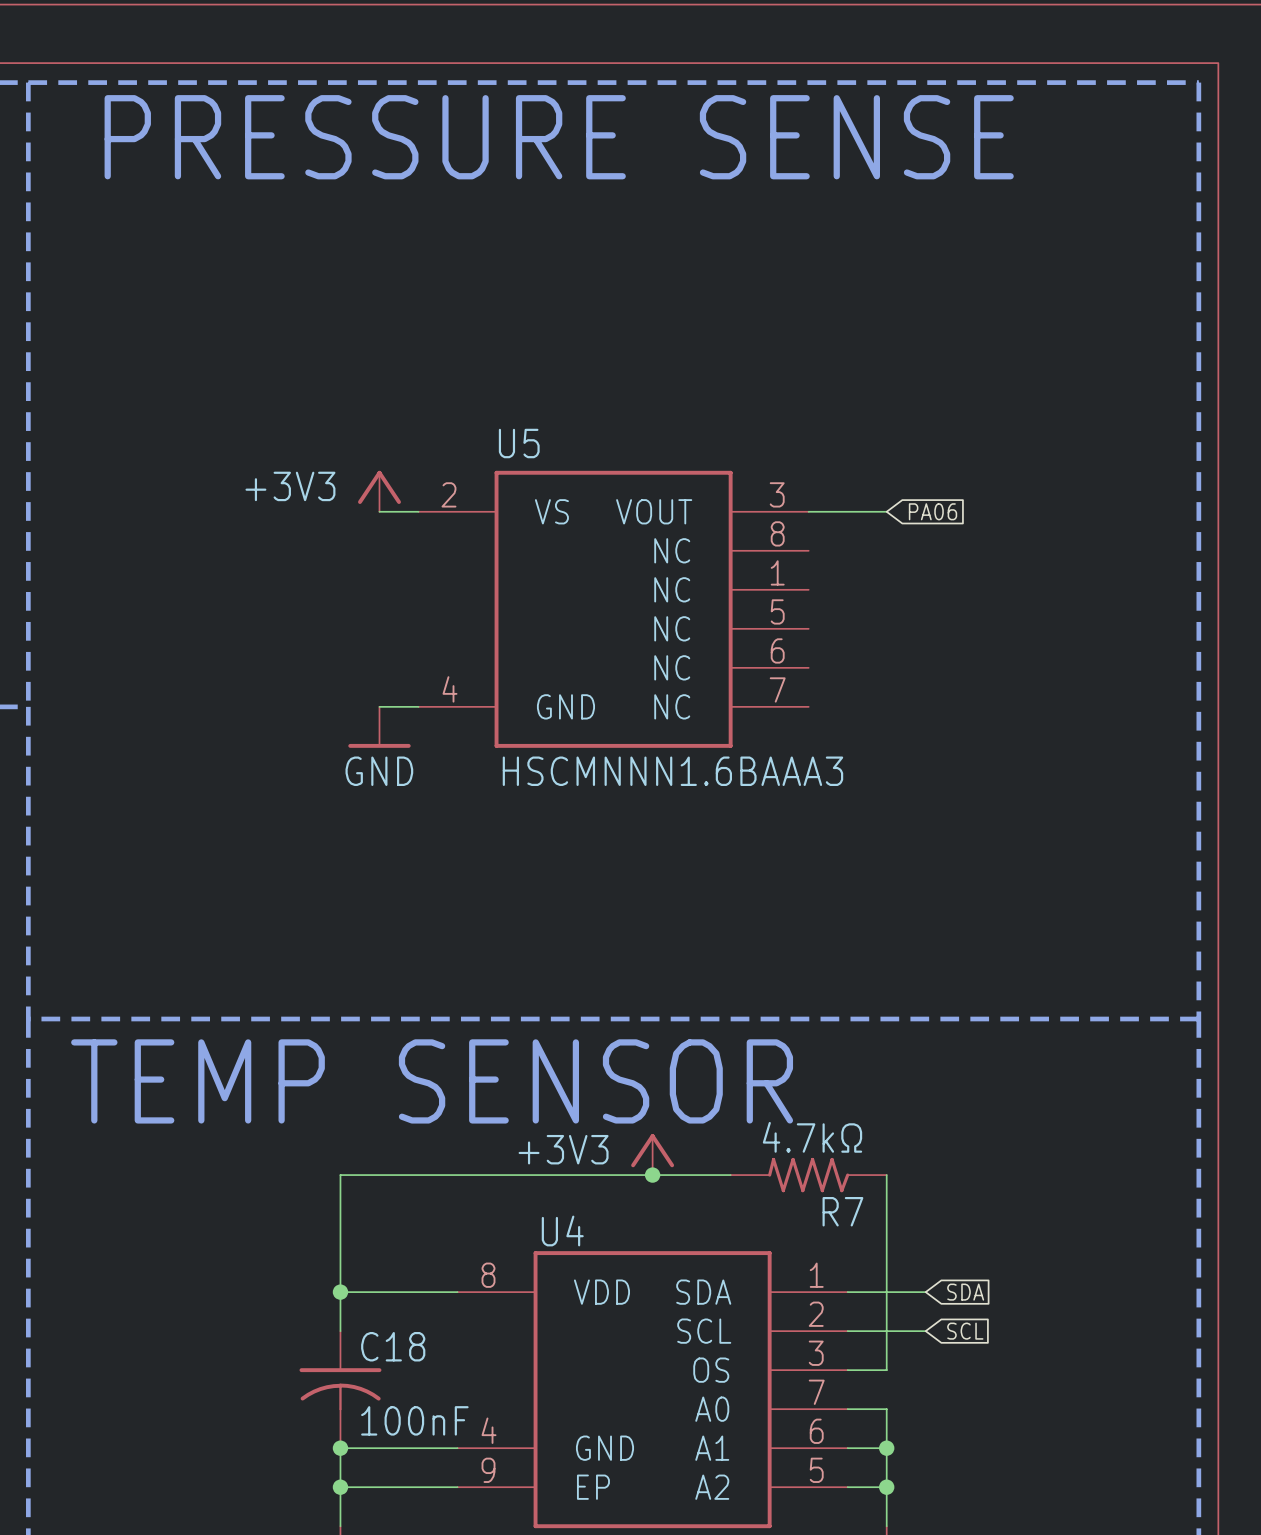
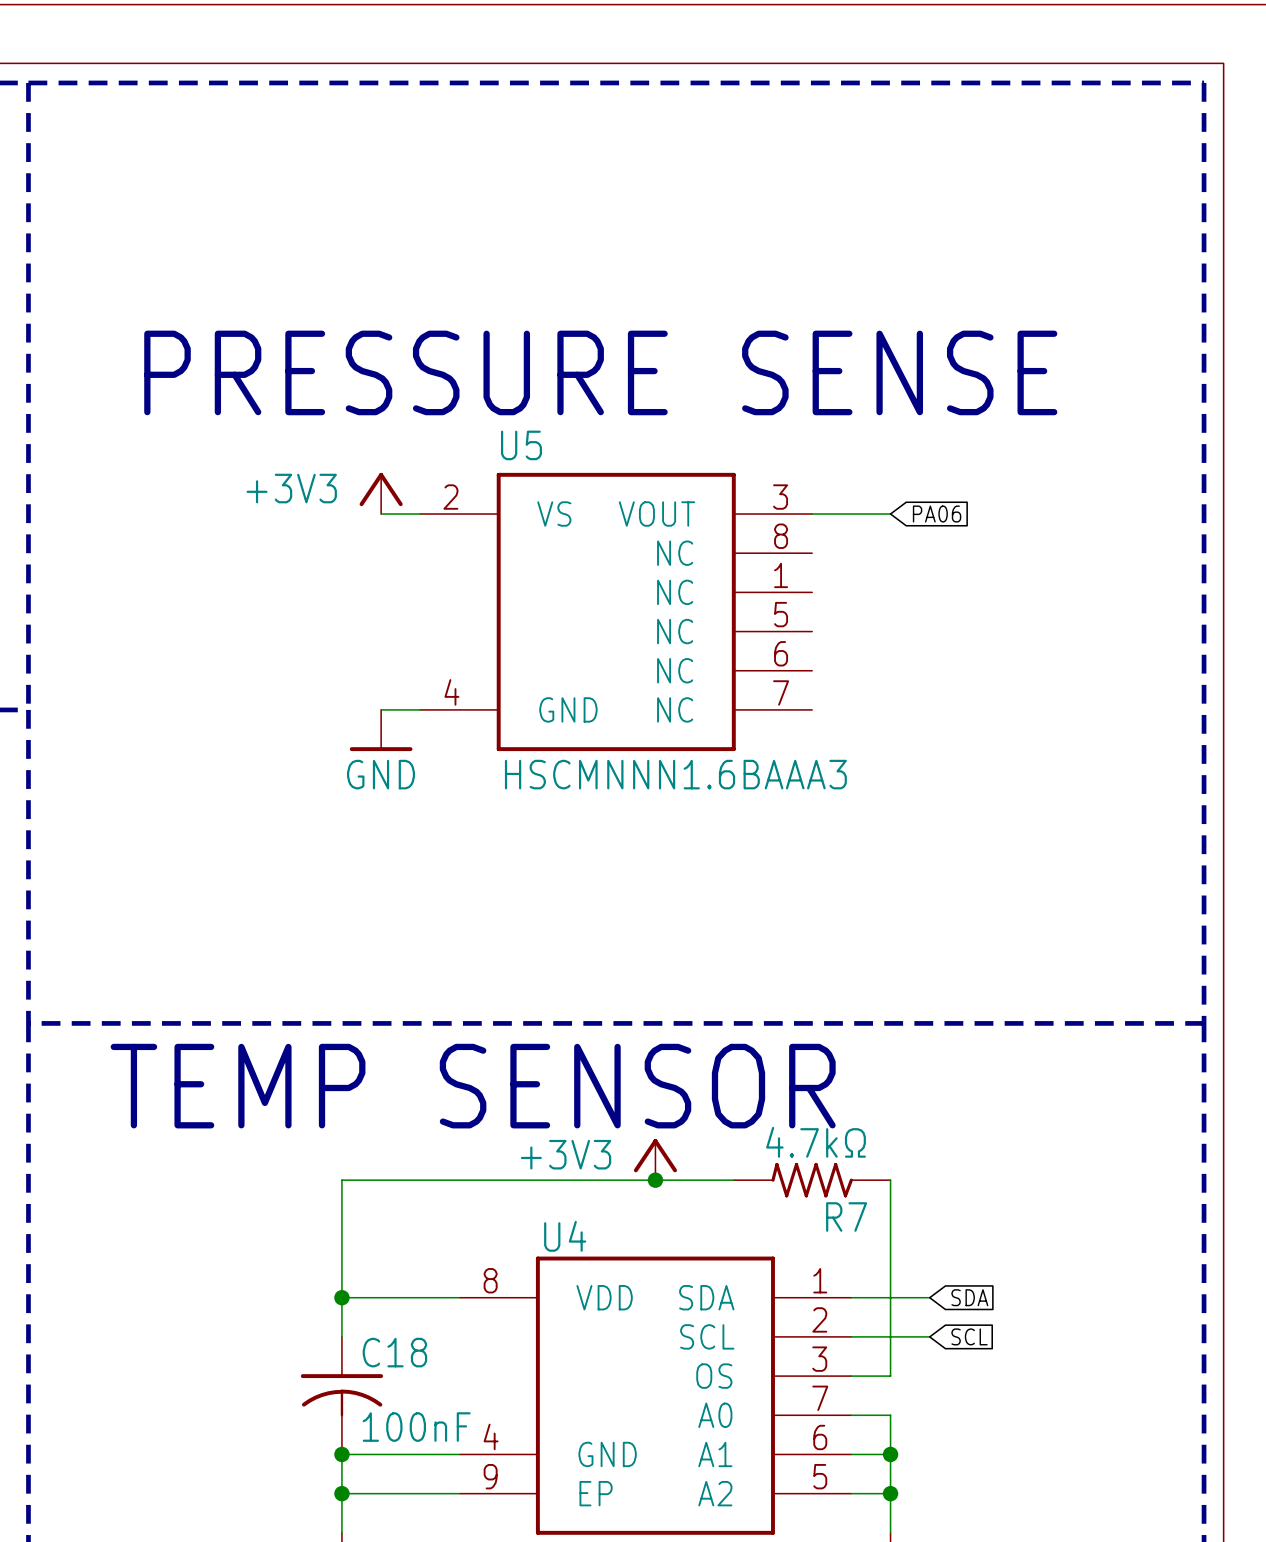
text position: PRESSURE SENSE (559, 137) -> PRESSURE SENSE (600, 372)
text position: TEMP SENSOR (432, 1081) -> TEMP SENSOR (473, 1086)

